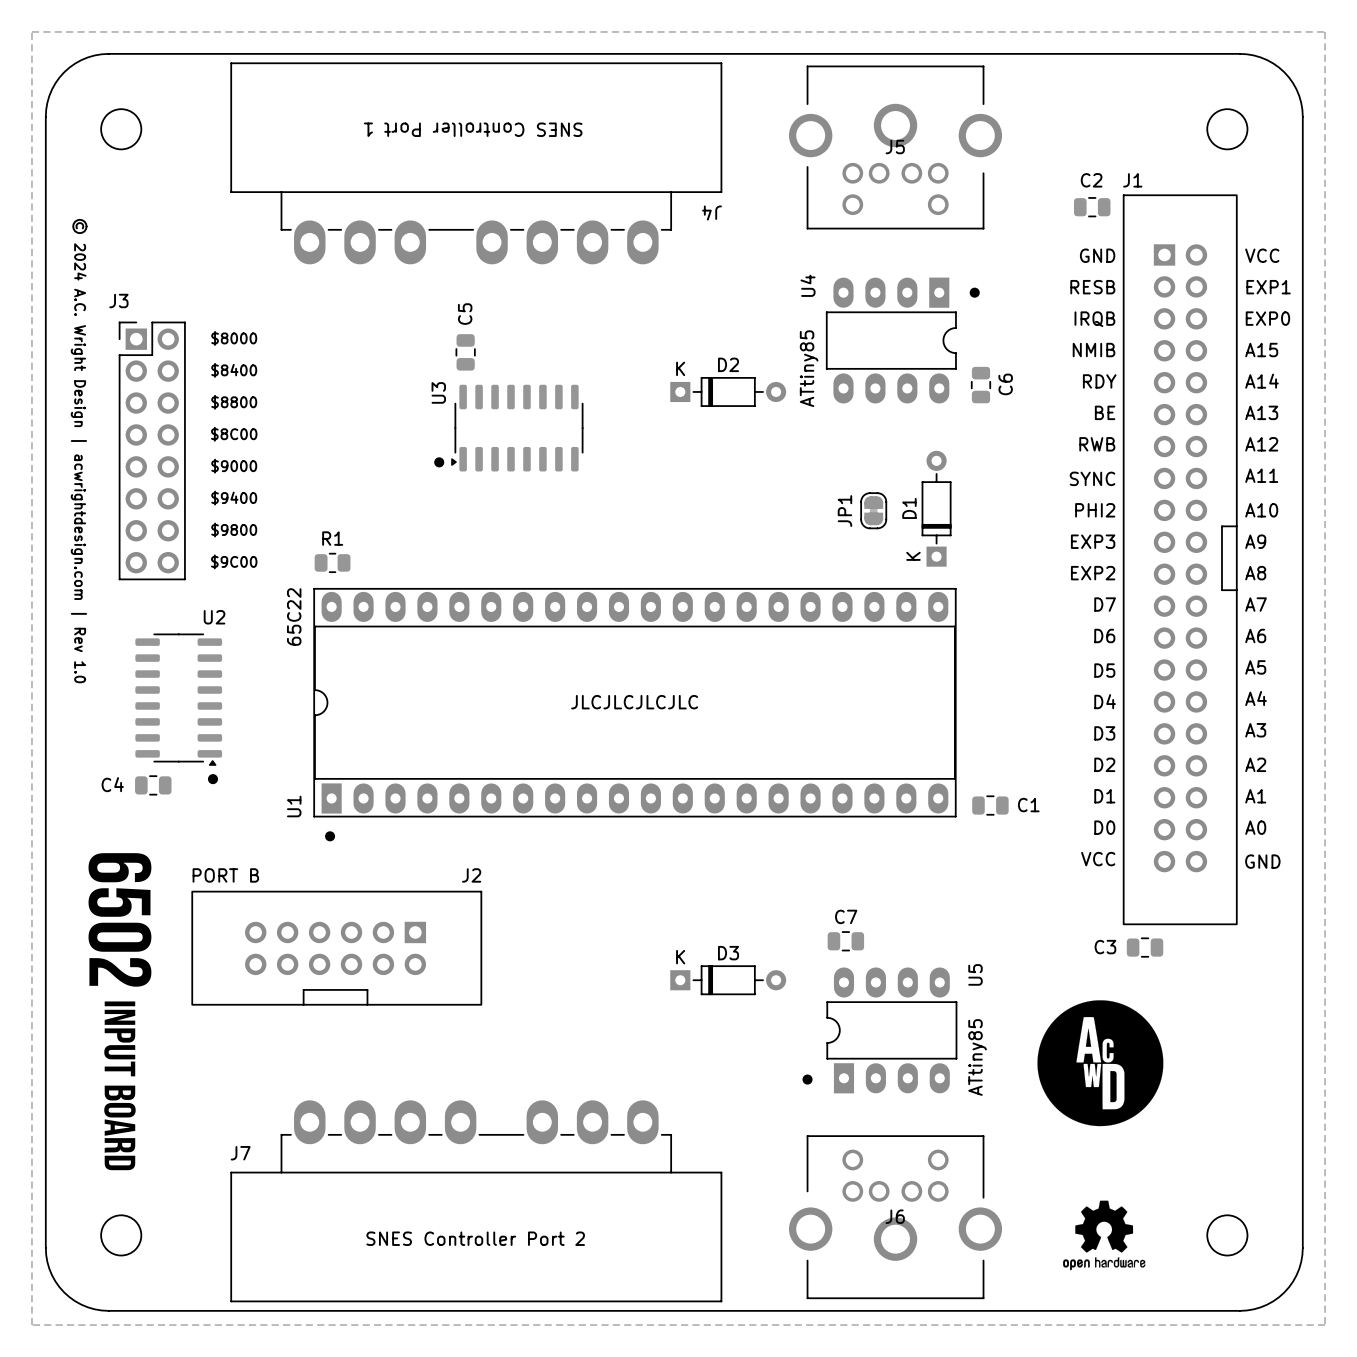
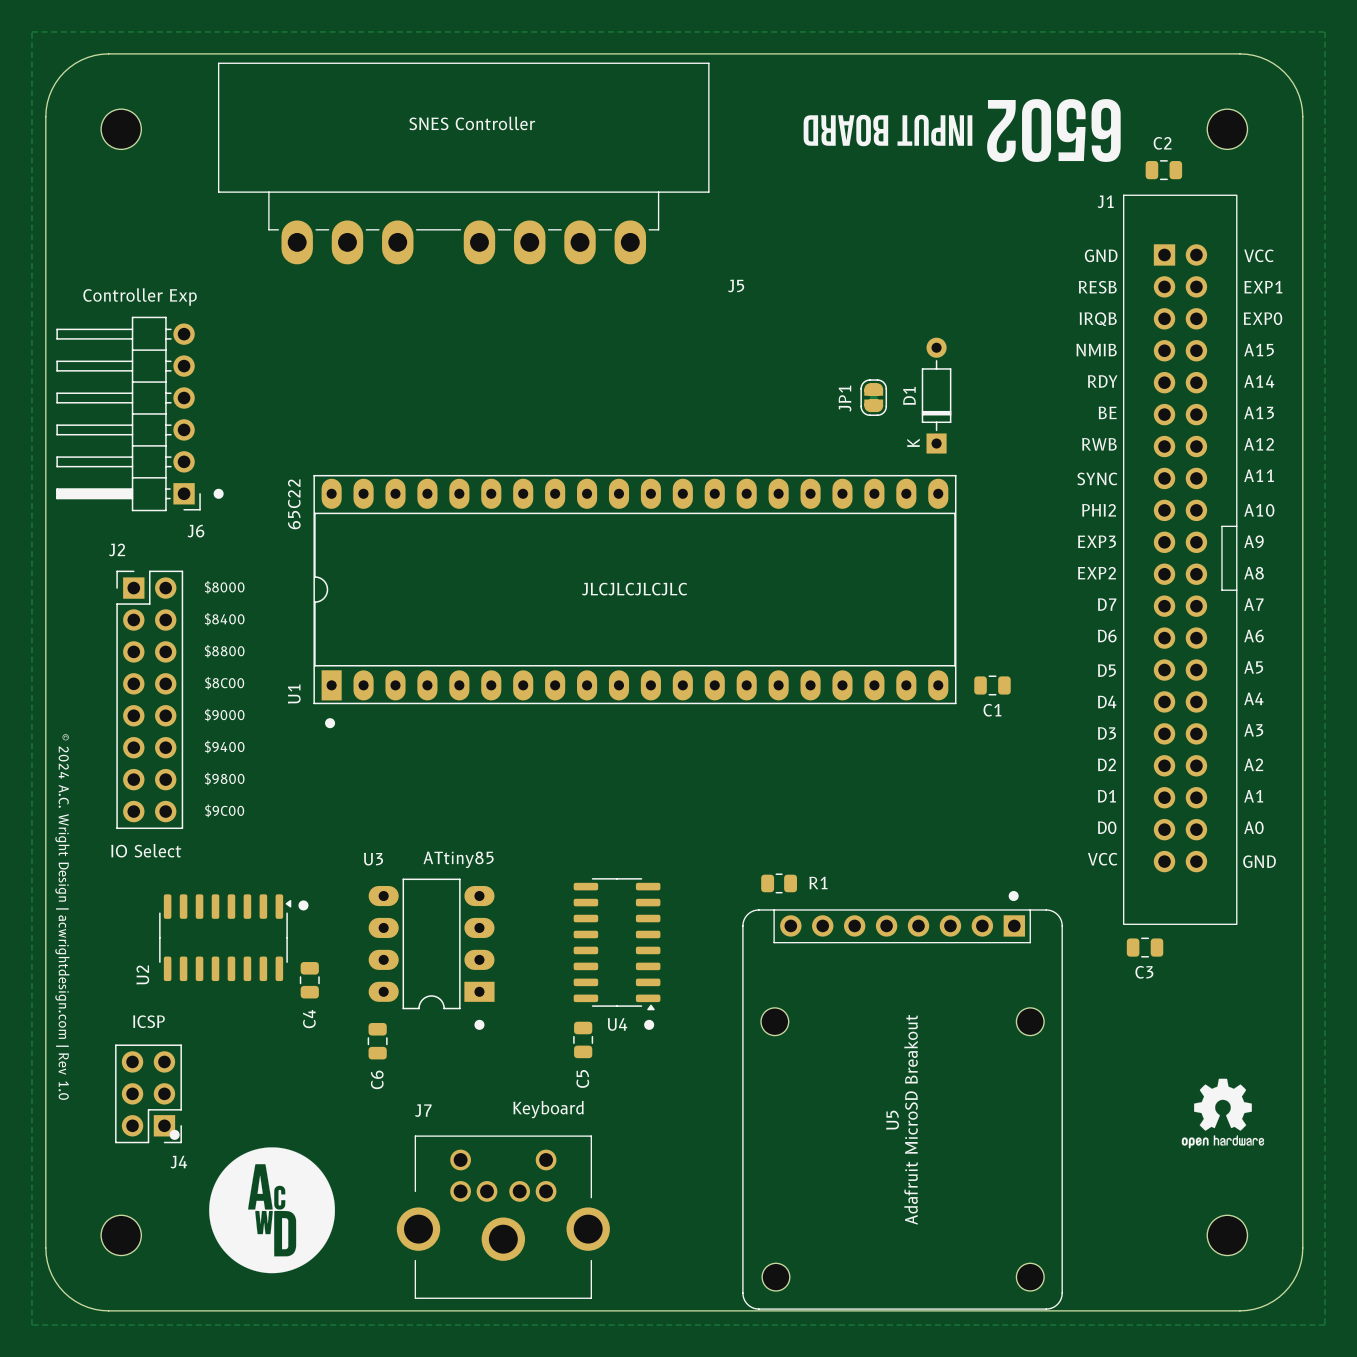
J4 footprint: [230, 62, 723, 265] -> [115, 1044, 182, 1144]
J5 footprint: [788, 65, 1003, 230] -> [218, 62, 710, 265]
drawing: none -> [803, 99, 1121, 162]
text: none -> SNES Controller (472, 123)
J4 value: SNES Controller Port 1 (473, 129) -> ICSP (148, 1021)
J5 name position: J5 (895, 147) -> J5 (736, 285)
J1 name position: J1 (1132, 180) -> J1 (1105, 201)
C2 position: (1092, 207) -> (1163, 170)
J4 name position: J4 (712, 212) -> J4 (178, 1162)
U4 footprint: [826, 277, 957, 404] -> [573, 878, 661, 1011]
U4 name position: U4 (808, 285) -> U4 (617, 1024)
drawing: [969, 287, 980, 298] -> none
J6 value: none -> Controller Exp (140, 297)
C5 name position: C5 (465, 314) -> C5 (582, 1078)
text position: $8000 (234, 338) -> $8000 (224, 587)
C5 position: (465, 352) -> (583, 1039)
U4 value: ATtiny85 (809, 368) -> none
text position: $8400 (234, 370) -> $8400 (224, 619)
U3 footprint: [451, 384, 584, 472] -> [368, 878, 495, 1010]
C6 name position: C6 (1005, 384) -> C6 (377, 1079)
C6 position: (981, 385) -> (377, 1041)
D2: (728, 391) -> none
U3 name position: U3 (438, 392) -> U3 (373, 859)
text position: $8800 (234, 402) -> $8800 (224, 651)
text position: $8C00 (234, 434) -> $8C00 (224, 683)
J3: (152, 450) -> none
text: © 2024 A.C. Wright Design | acwrightdesign.com | Rev 1.0 (79, 451) -> none
drawing: [434, 457, 445, 468] -> none
text position: $9000 (234, 466) -> $9000 (224, 715)
drawing: none -> [213, 488, 224, 499]
text position: $9400 (234, 498) -> $9400 (224, 746)
D1 position: (936, 508) -> (936, 395)
JP1 position: (873, 510) -> (873, 397)
text position: $9800 (234, 529) -> $9800 (224, 778)
R1 name position: R1 (332, 538) -> R1 (818, 882)
text position: $9C00 (234, 561) -> $9C00 (224, 810)
R1 position: (332, 562) -> (779, 883)
U2 name position: U2 (214, 617) -> U2 (142, 974)
U2 rotation: 0° (178, 699) -> 90° counterclockwise (225, 937)
U2 position: (178, 699) -> (225, 937)
U1 position: (634, 702) -> (634, 589)
text position: JLCJLCJLCJLC (634, 702) -> JLCJLCJLCJLC (634, 589)
drawing: none -> [325, 718, 336, 729]
drawing: [207, 774, 219, 785] -> none
C4 name position: C4 (112, 784) -> C4 (309, 1019)
C4 rotation: 0° (153, 785) -> 90° clockwise (309, 980)
C4 position: (153, 785) -> (309, 980)
C1 position: (990, 805) -> (992, 685)
C1 name position: C1 (1028, 805) -> C1 (992, 710)
drawing: [325, 831, 336, 842] -> none
text: none -> IO Select (146, 850)
drawing: [88, 853, 152, 1171] -> none
U3 value: none -> ATtiny85 (458, 859)
J2 value: PORT B (225, 875) -> none
J2 name position: J2 (471, 875) -> J2 (117, 549)
J2 footprint: [191, 891, 482, 1006] -> [116, 570, 184, 830]
drawing: none -> [1008, 891, 1019, 902]
drawing: none -> [298, 900, 309, 911]
text: none -> © 2024 A.C. Wright Design | acwrightdesign.com | Rev 1.0 (62, 917)
C7: (845, 941) -> none
C3 name position: C3 (1105, 947) -> C3 (1144, 972)
U5 footprint: [826, 967, 958, 1094] -> [742, 909, 1063, 1310]
U5 name position: U5 (975, 974) -> U5 (892, 1120)
D3: (728, 980) -> none
drawing: [1037, 1000, 1164, 1127] -> none
drawing: none -> [474, 1019, 485, 1030]
drawing: none -> [644, 1019, 655, 1030]
U5 value: ATtiny85 (977, 1057) -> Adafruit MicroSD Breakout (911, 1119)
drawing: [802, 1074, 813, 1085] -> none
J7 footprint: [230, 1100, 723, 1303] -> [396, 1135, 610, 1299]
drawing: none -> [169, 1129, 180, 1140]
J6 footprint: [788, 1135, 1003, 1299] -> [56, 316, 201, 512]
drawing: none -> [209, 1147, 335, 1274]
J7 name position: J7 (240, 1153) -> J7 (423, 1110)
J6 name position: J6 (895, 1216) -> J6 (195, 531)
drawing position: (1104, 1235) -> (1222, 1113)
J7 value: SNES Controller Port 2 (475, 1238) -> Keyboard (548, 1109)

